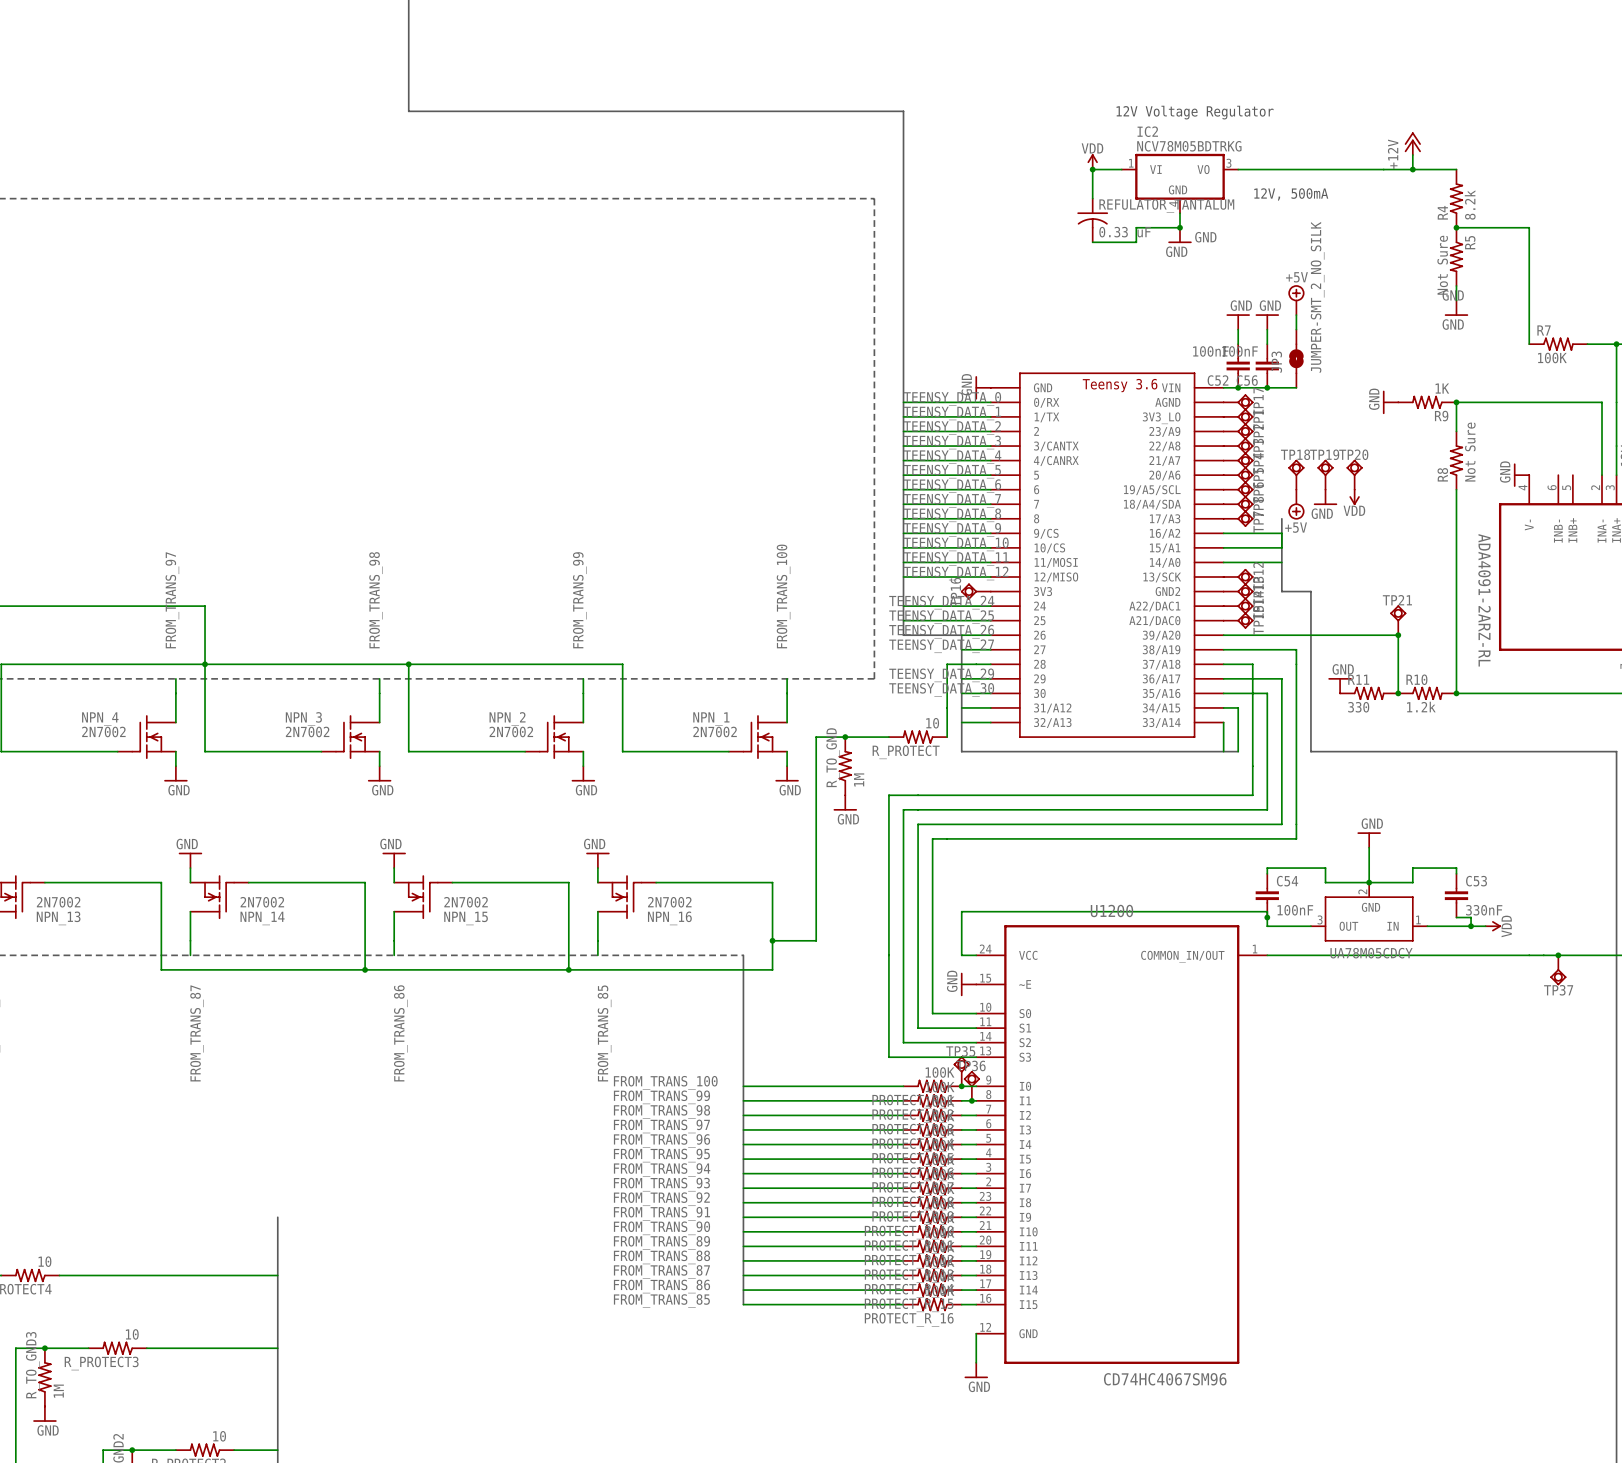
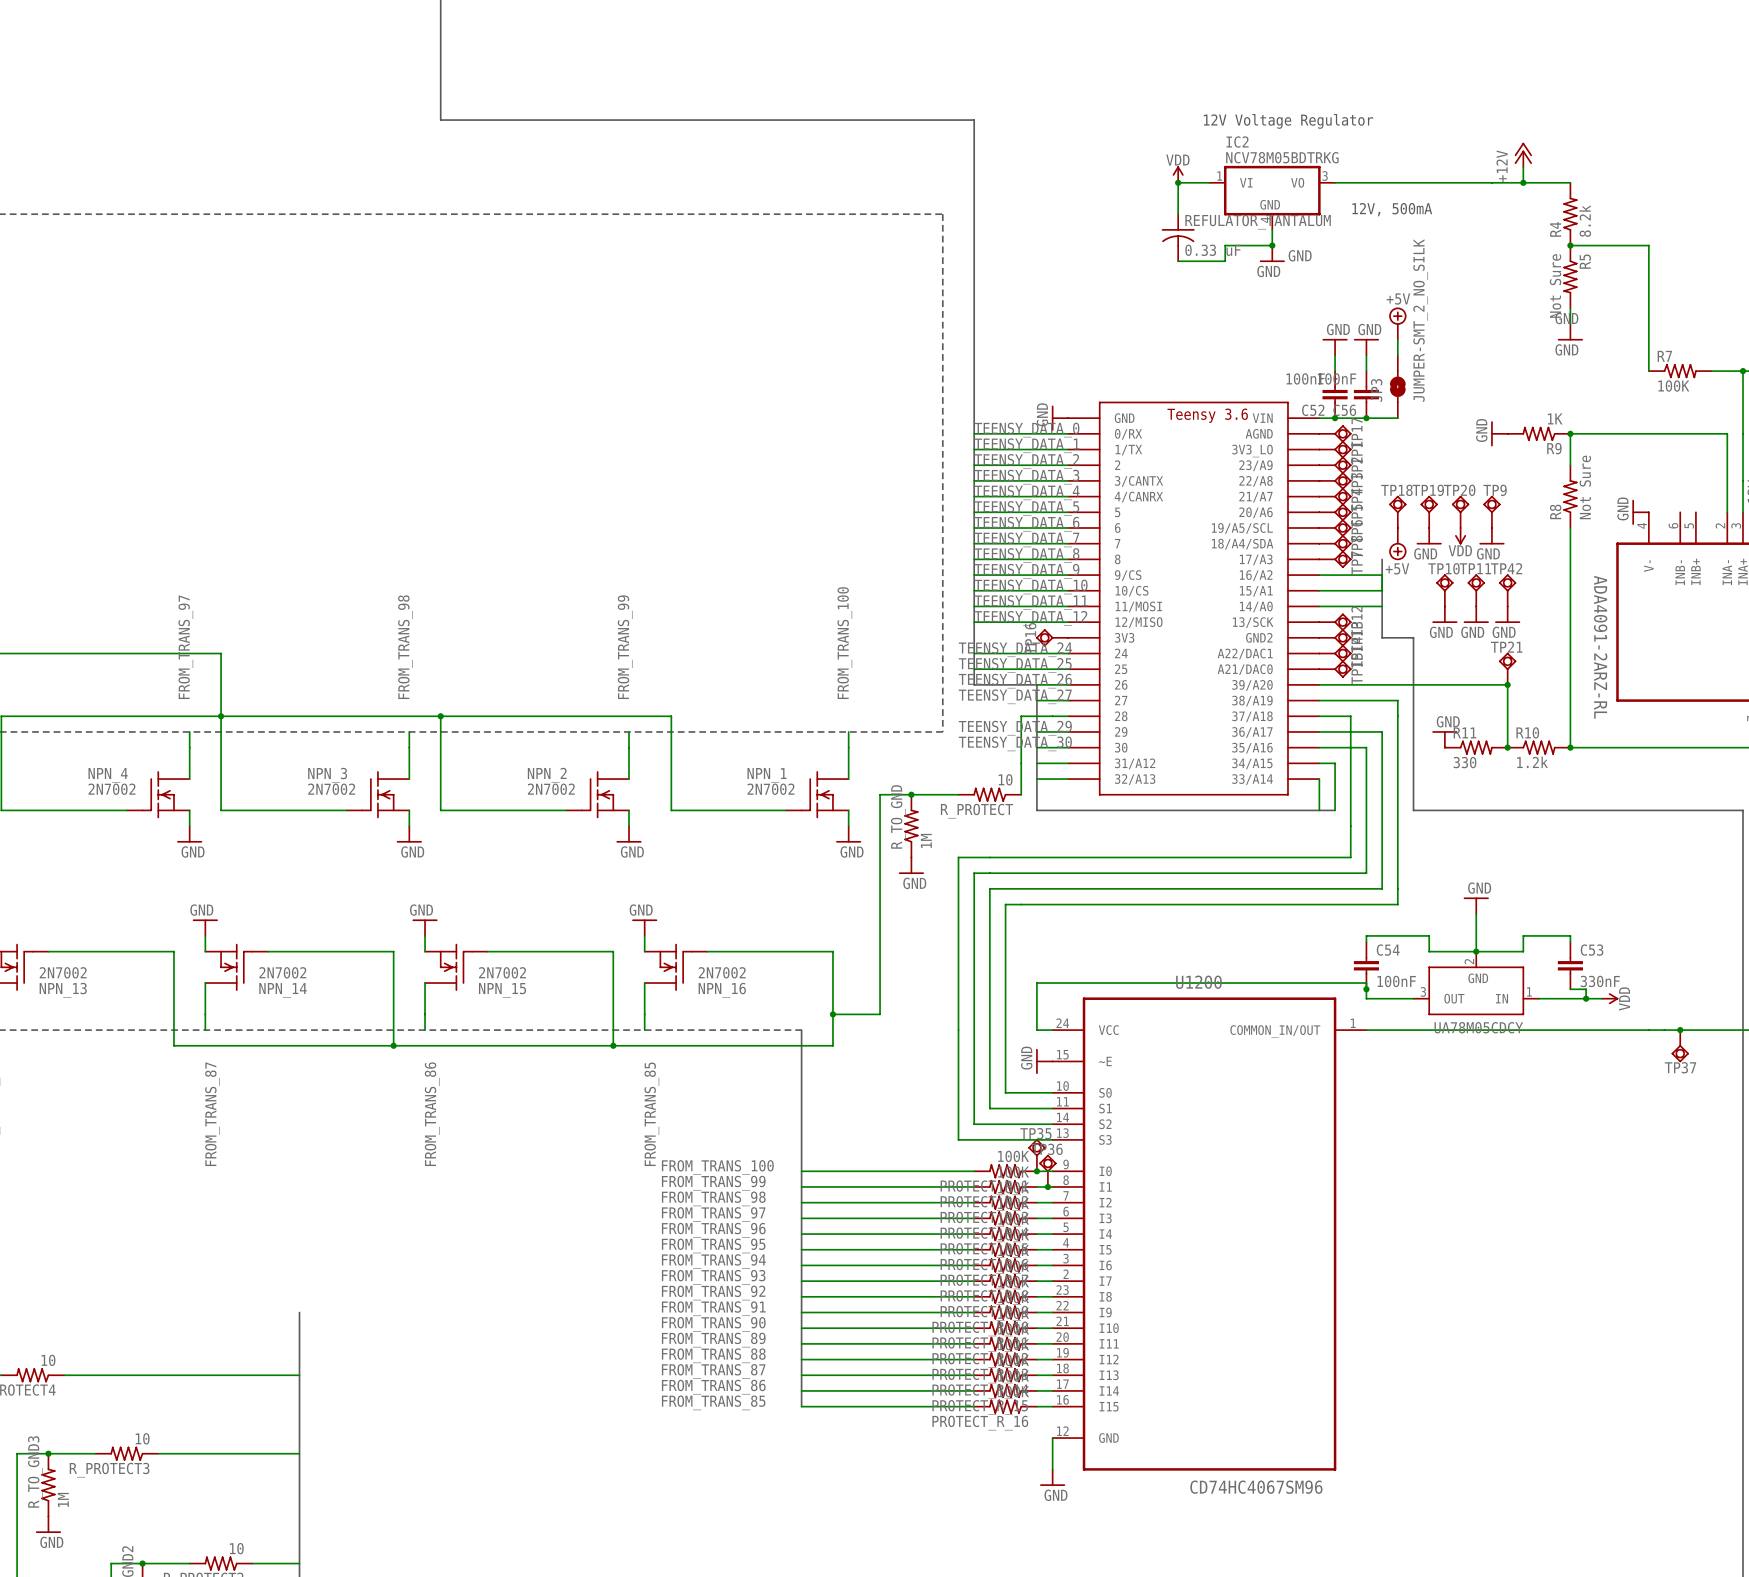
TP9: none -> (1491, 512)
power symbol: none -> GND (1491, 536)
TP10: none -> (1444, 590)
TP11: none -> (1476, 590)
TP42: none -> (1507, 590)
power symbol: none -> GND (1444, 614)
power symbol: none -> GND (1476, 614)
power symbol: none -> GND (1507, 614)

